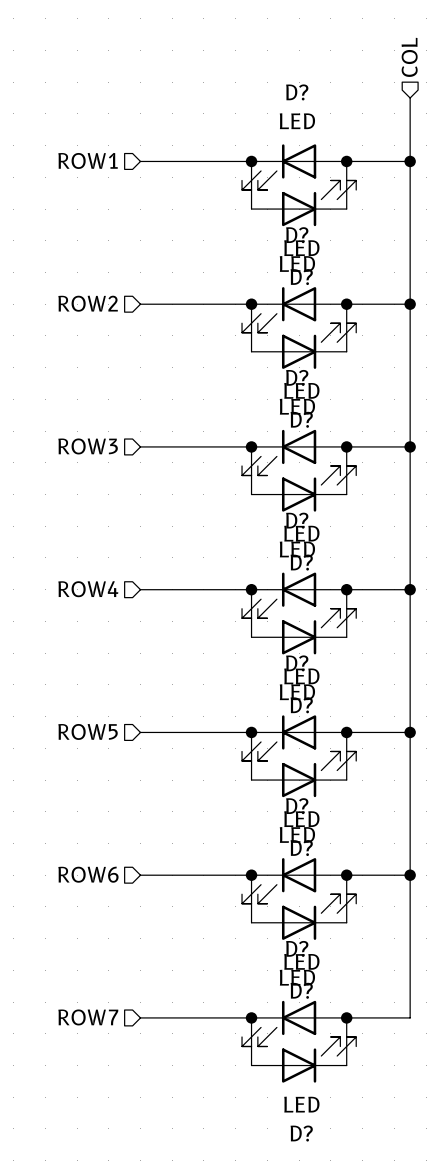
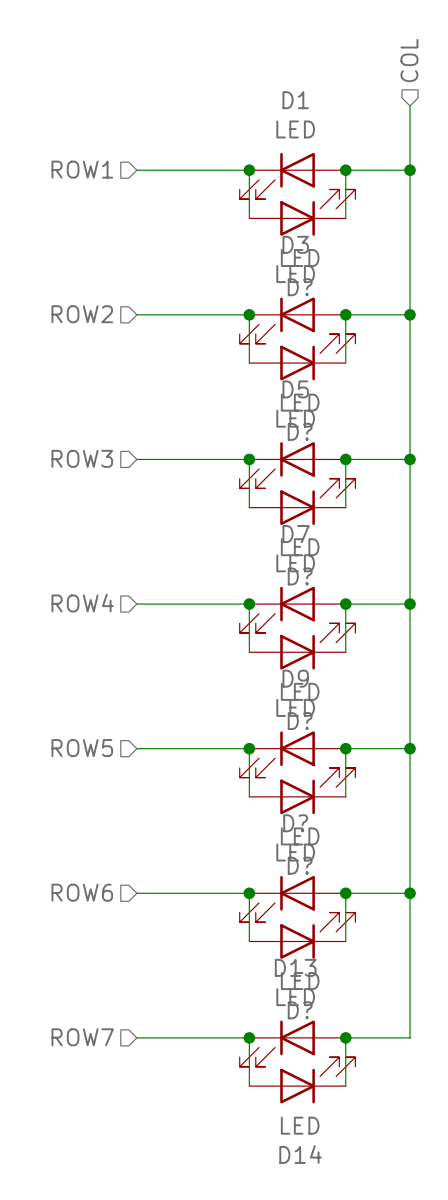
D? name: D? (297, 92) -> D1 (295, 100)
D? name: D? (297, 235) -> D3 (295, 244)
D? name: D? (297, 377) -> D5 (295, 389)
D? name: D? (297, 520) -> D7 (296, 534)
D? name: D? (297, 663) -> D9 (295, 678)
D? name: D? (297, 948) -> D13 (295, 967)
D? name: D? (301, 1133) -> D14 (300, 1154)

